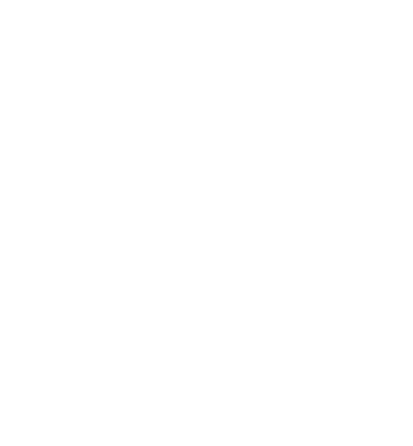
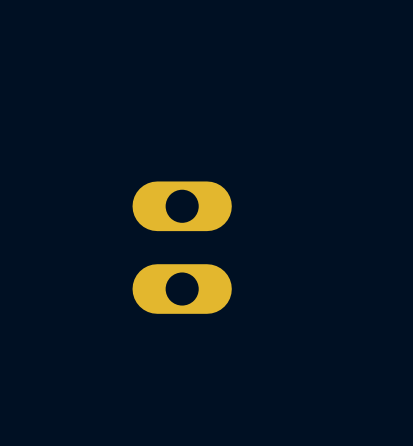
part: none -> (182, 247)

